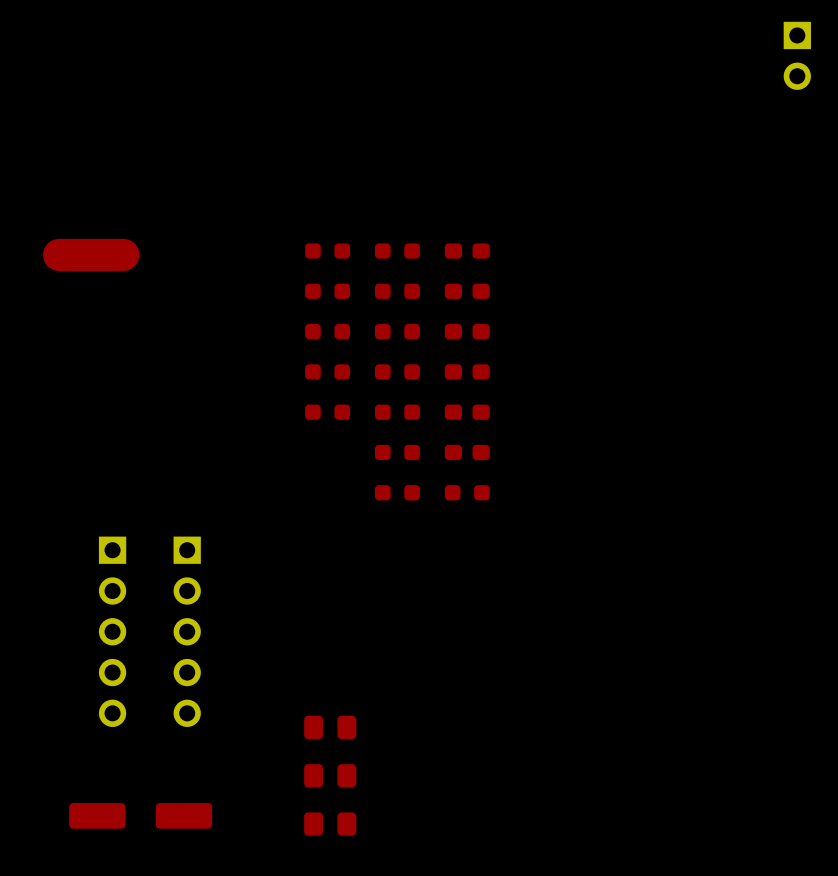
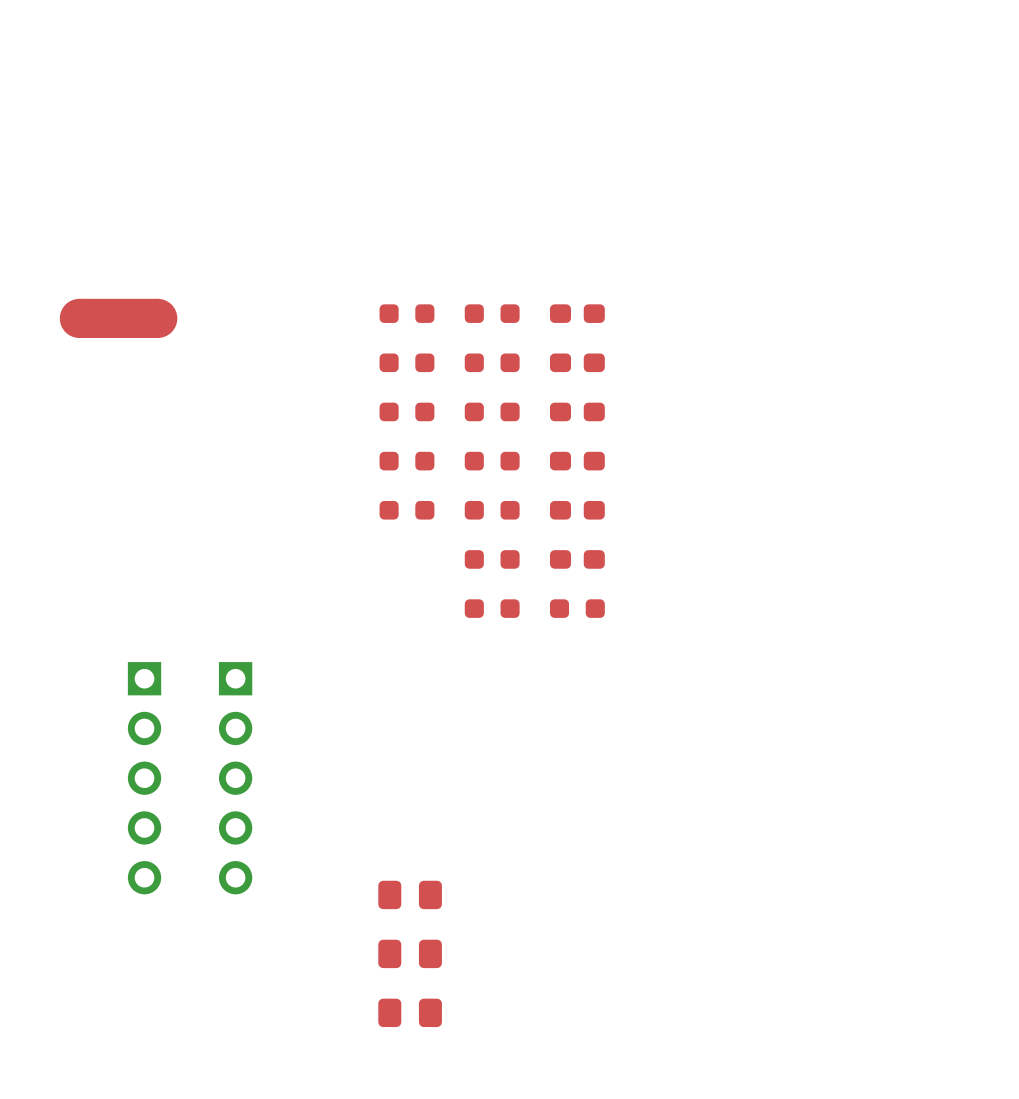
part: (797, 55) -> none
part: (140, 815) -> none

